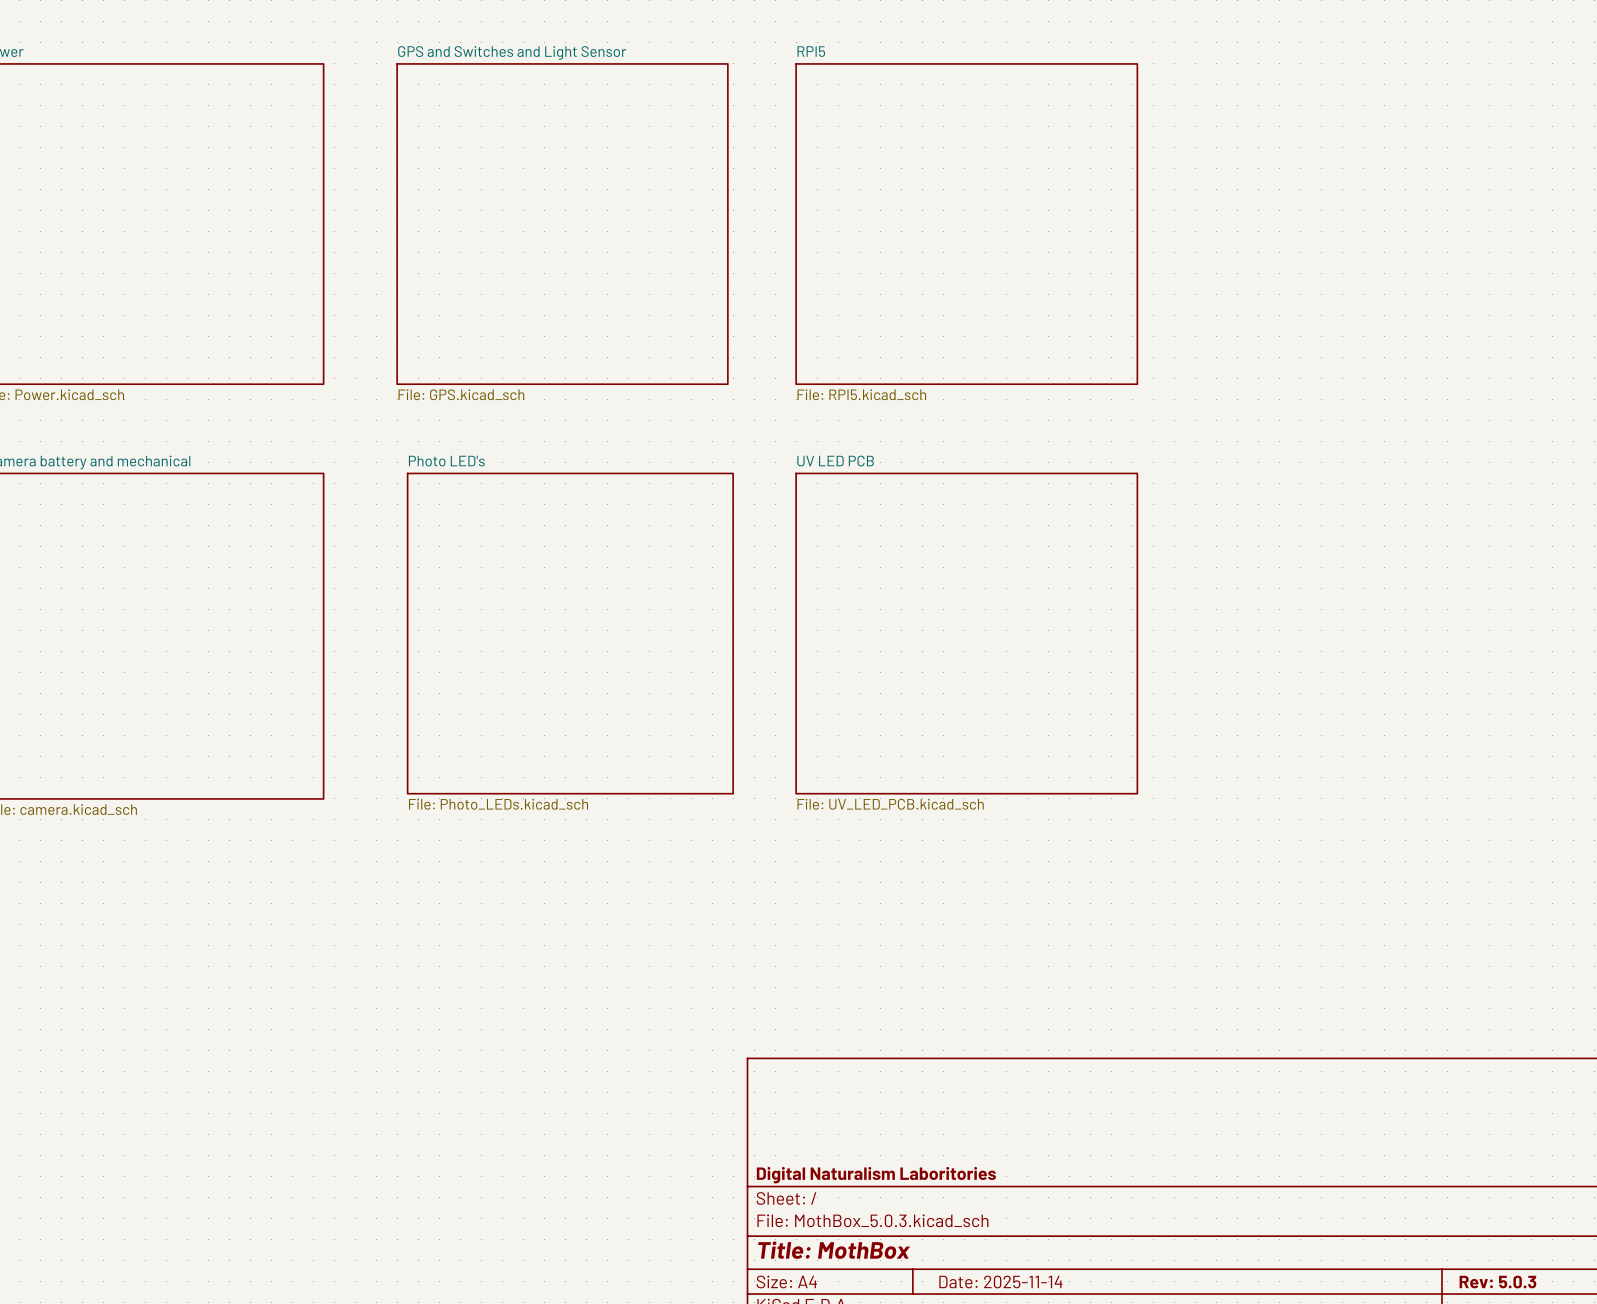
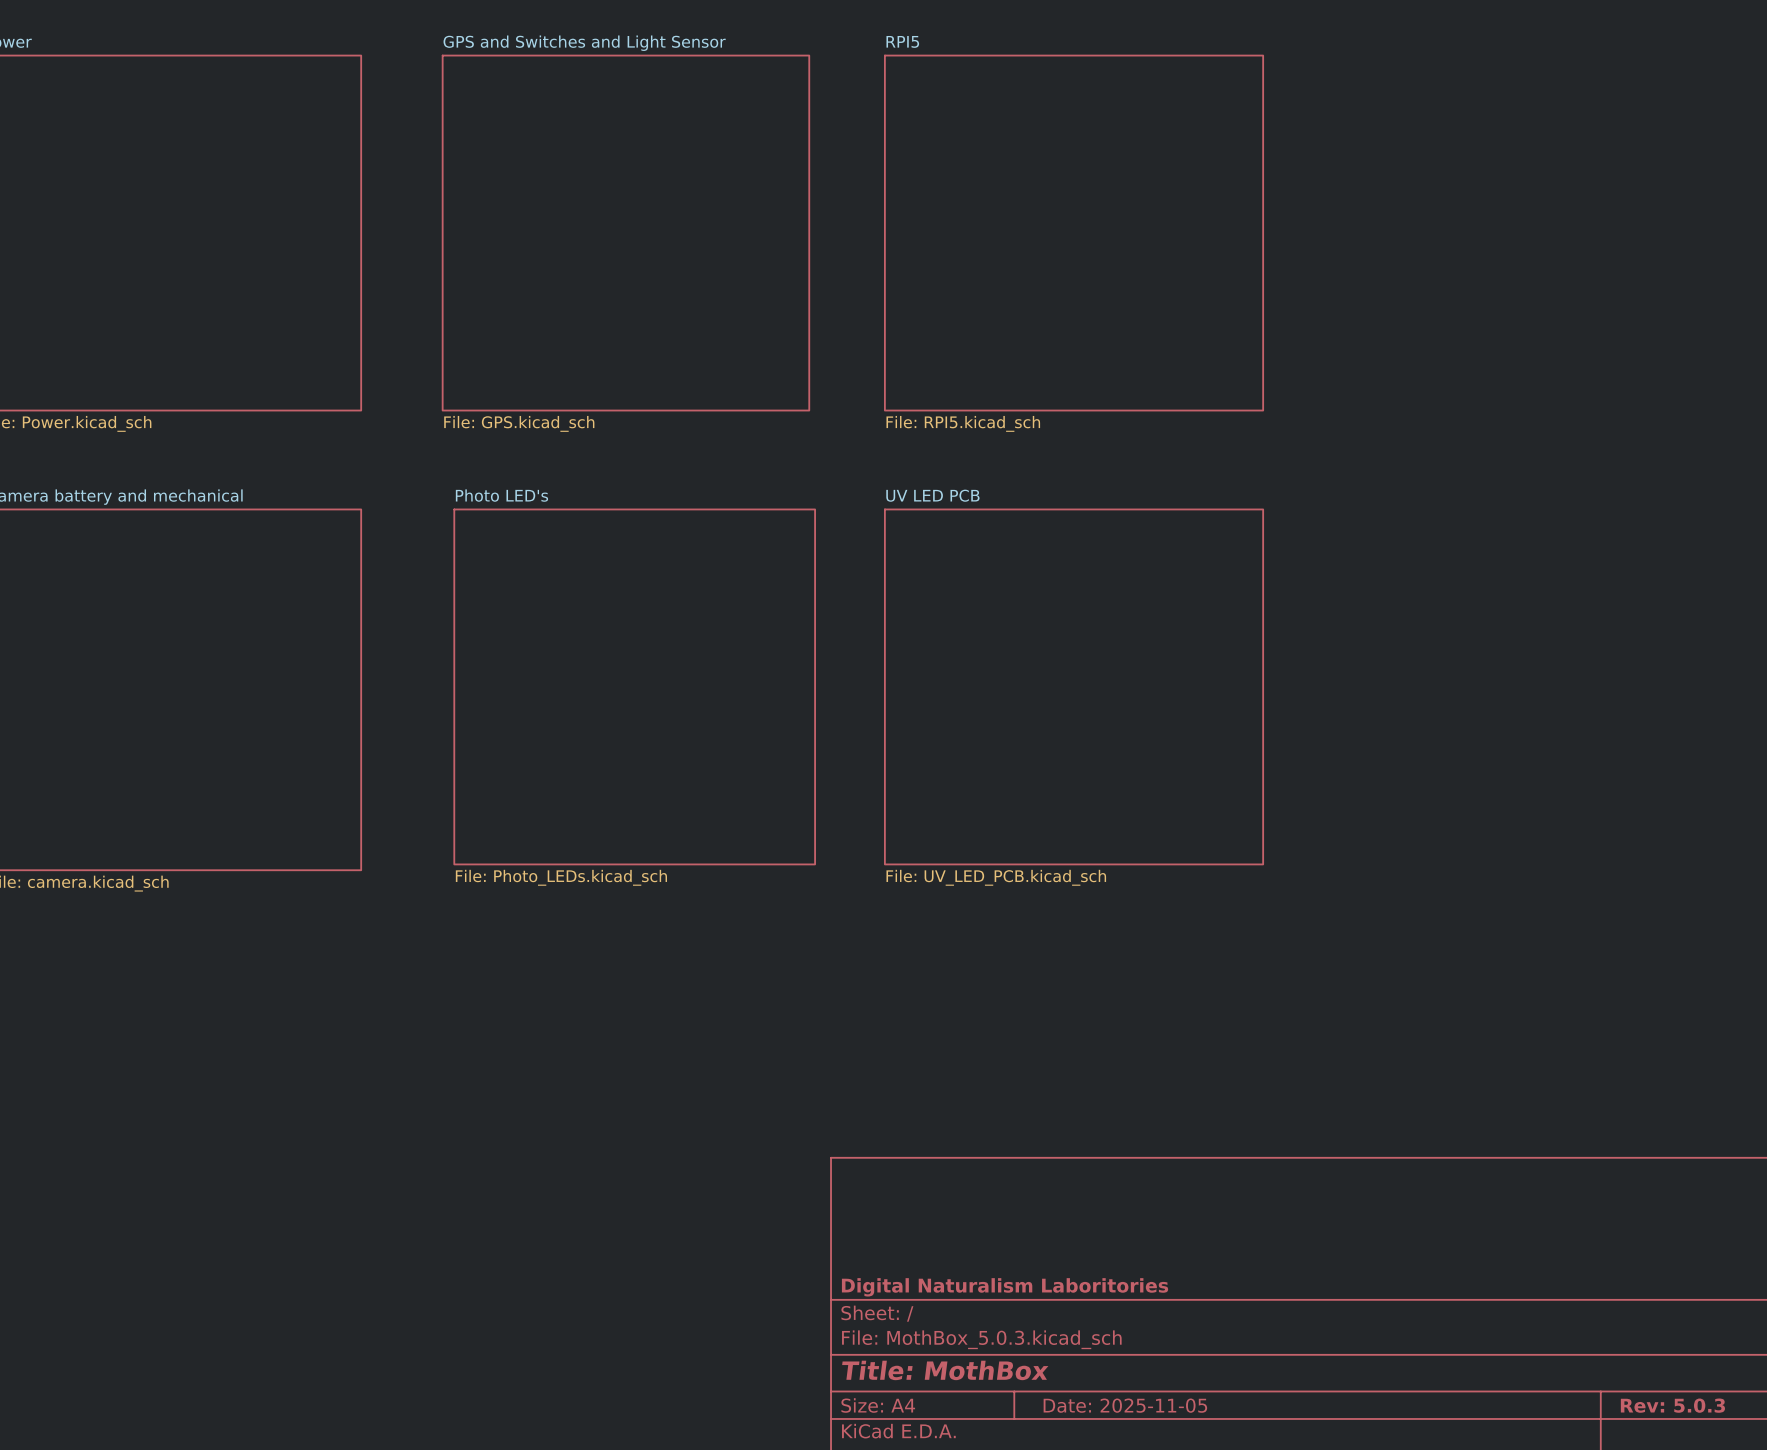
title block: Date: 2025-11-14 (1000, 1281) -> Date: 2025-11-05 (1125, 1405)

